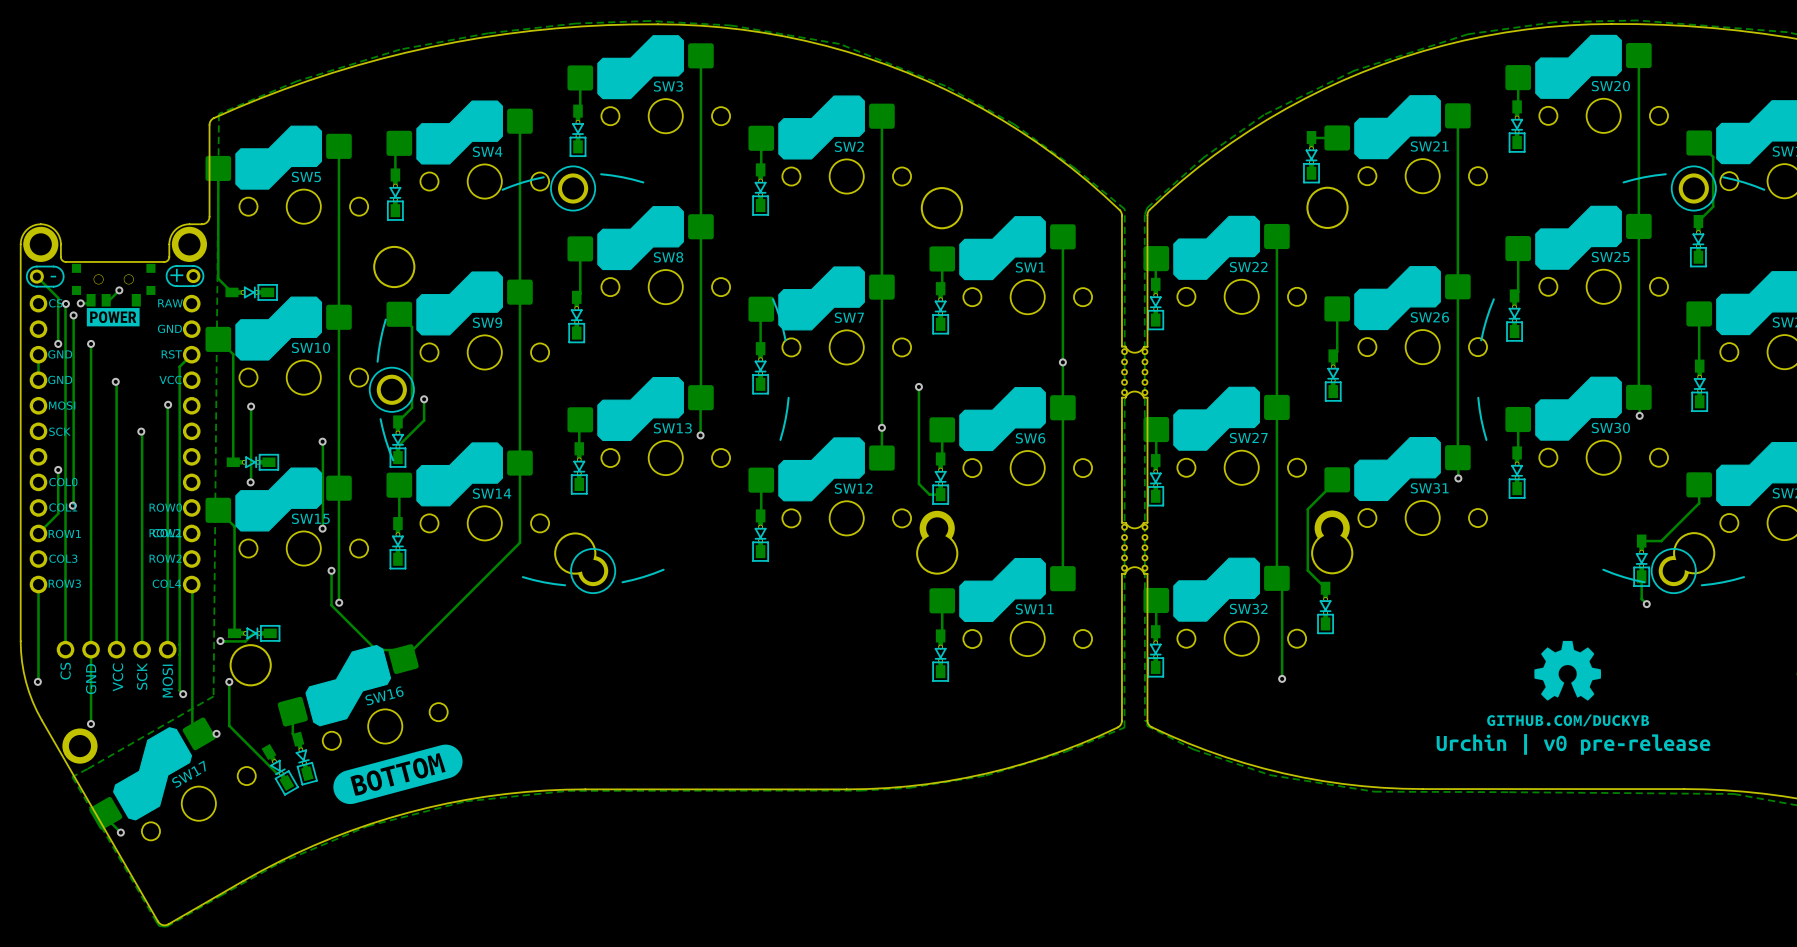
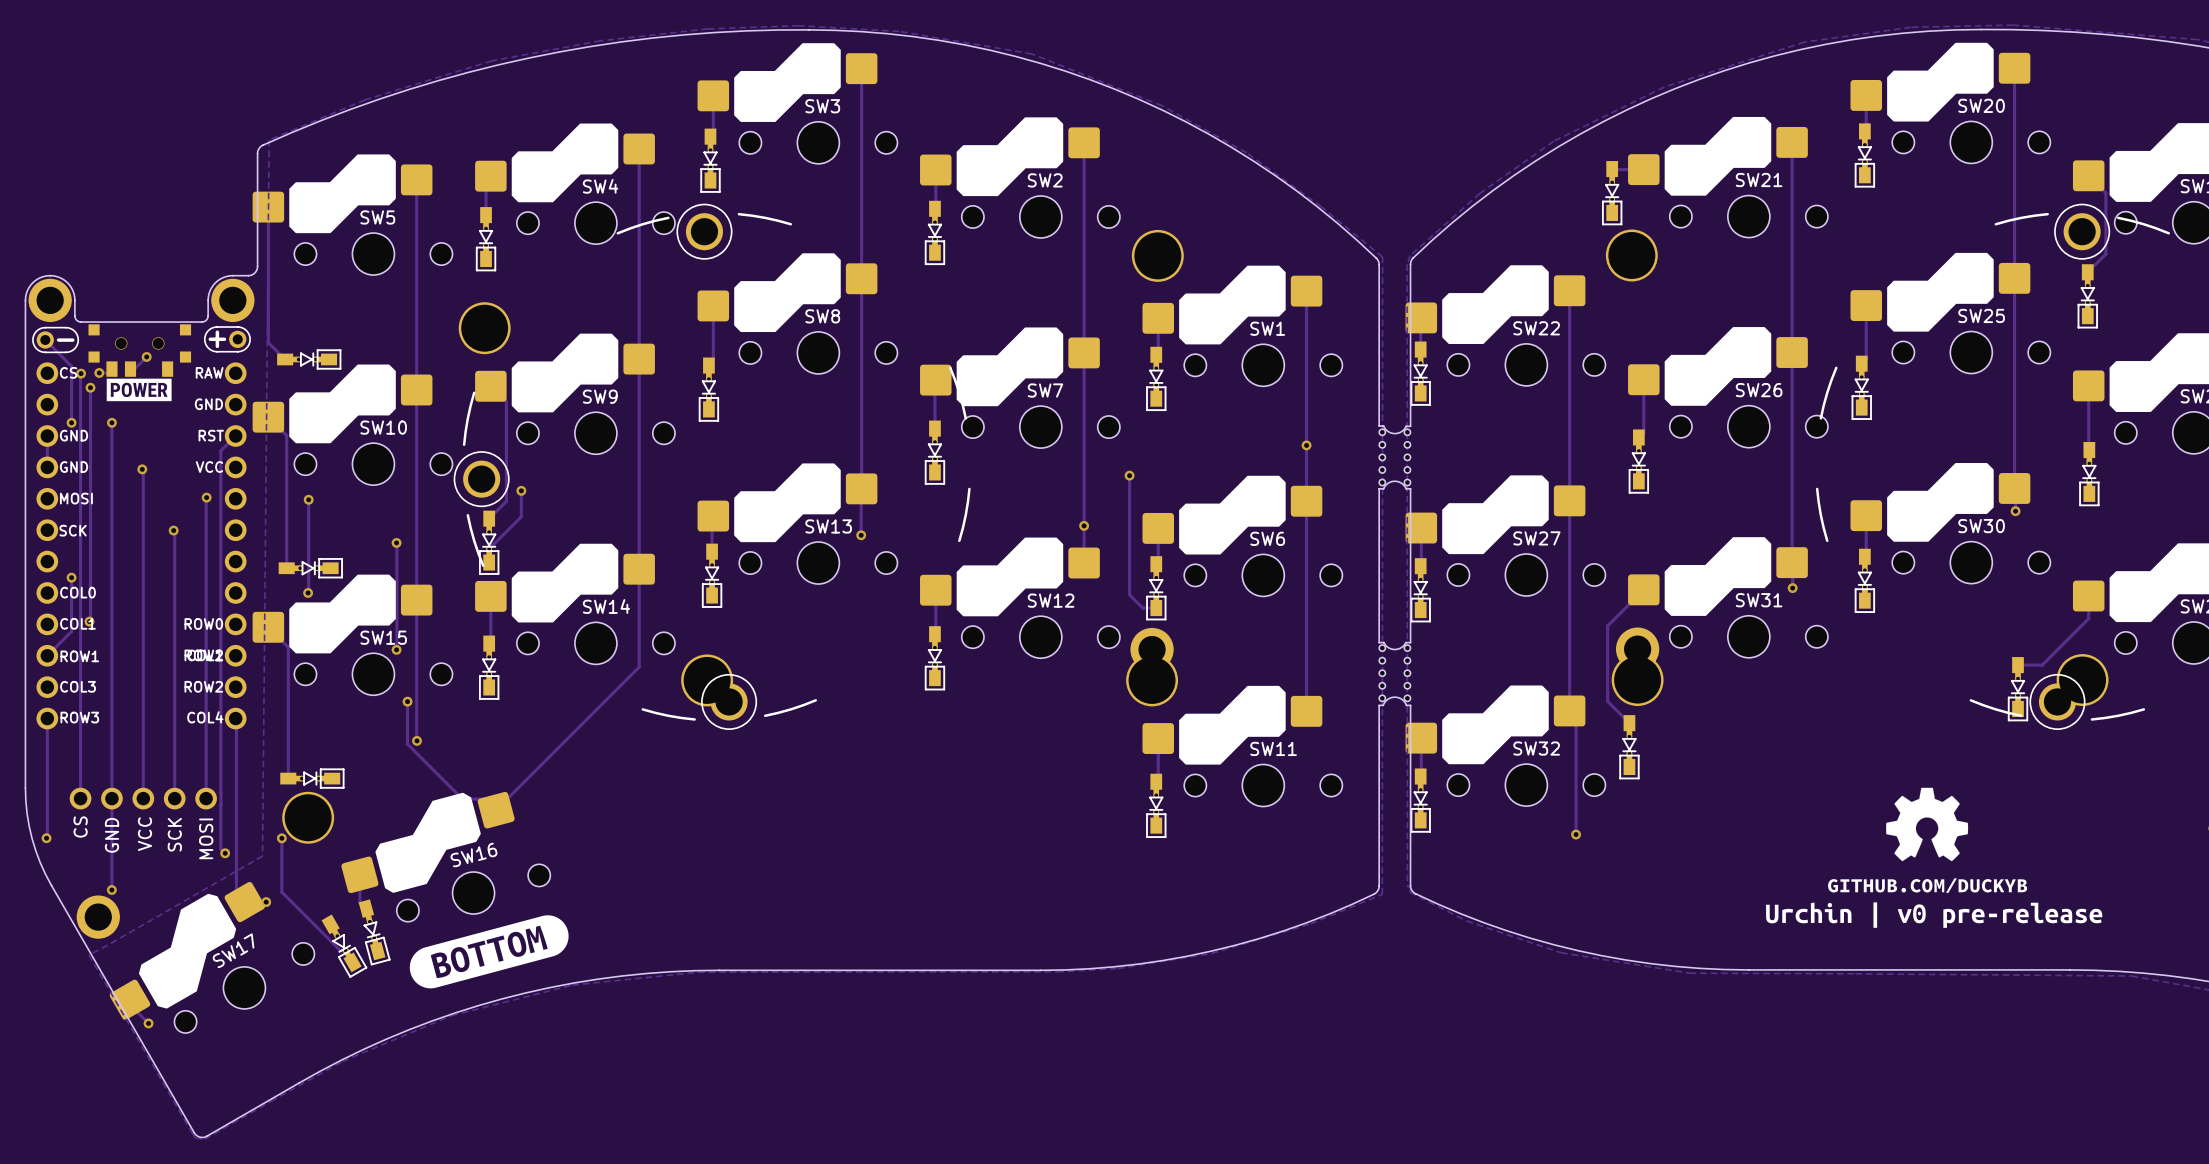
track: (1641, 576) (1641, 599) (1646, 604) -> none
via: (1646, 604) -> none
track: (259, 633) (253, 633) (245, 641) (220, 641) -> none
via: (220, 641) -> none

